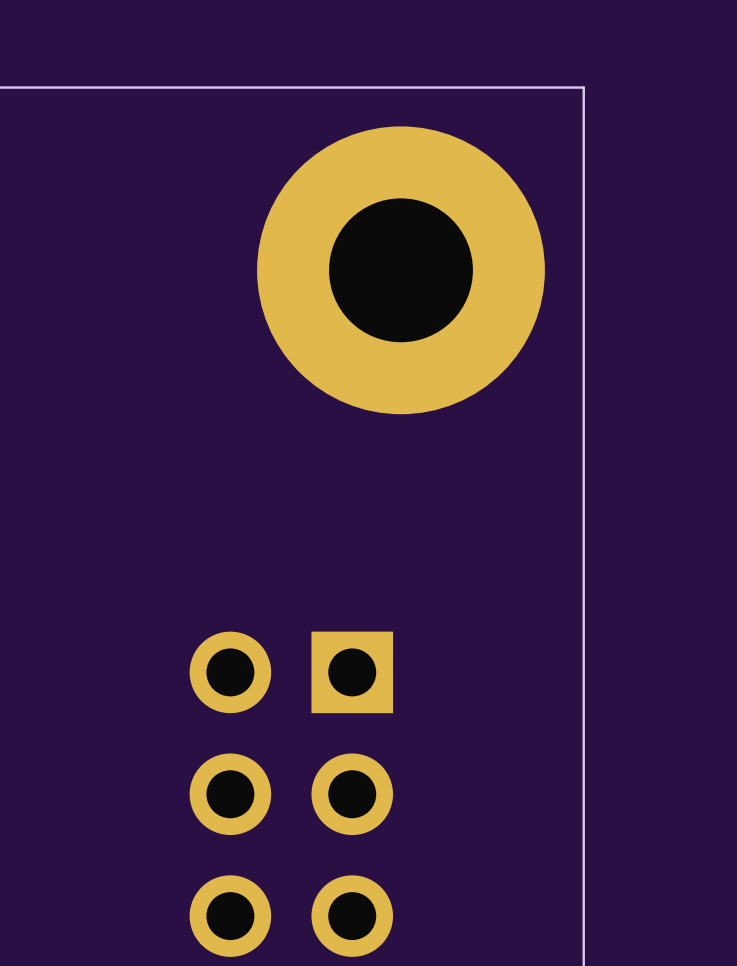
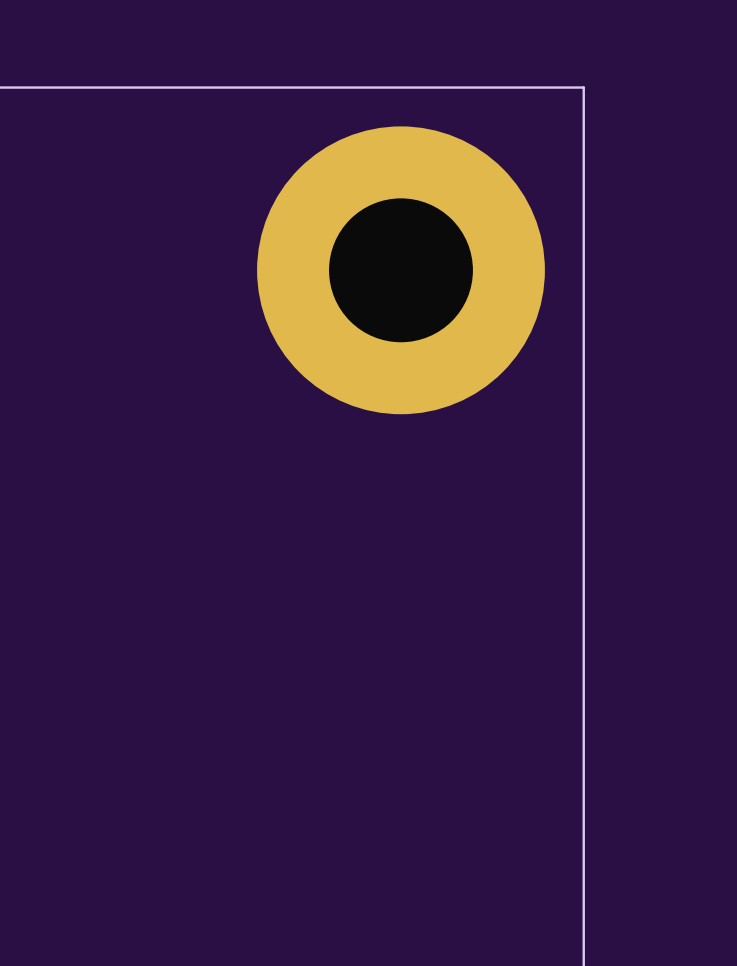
part: (291, 794) -> none

